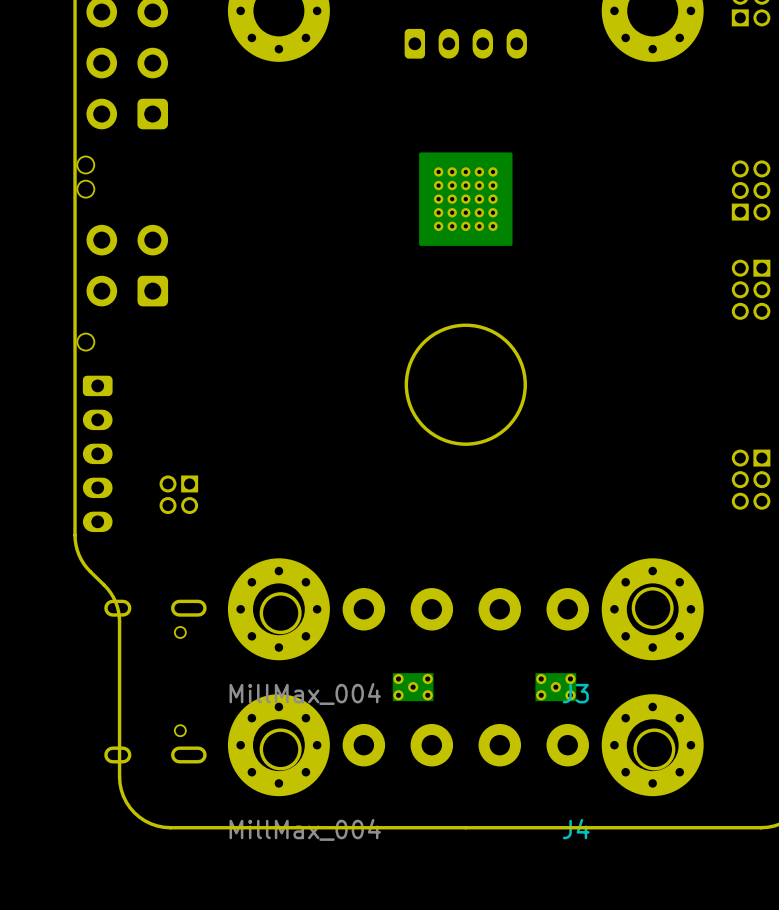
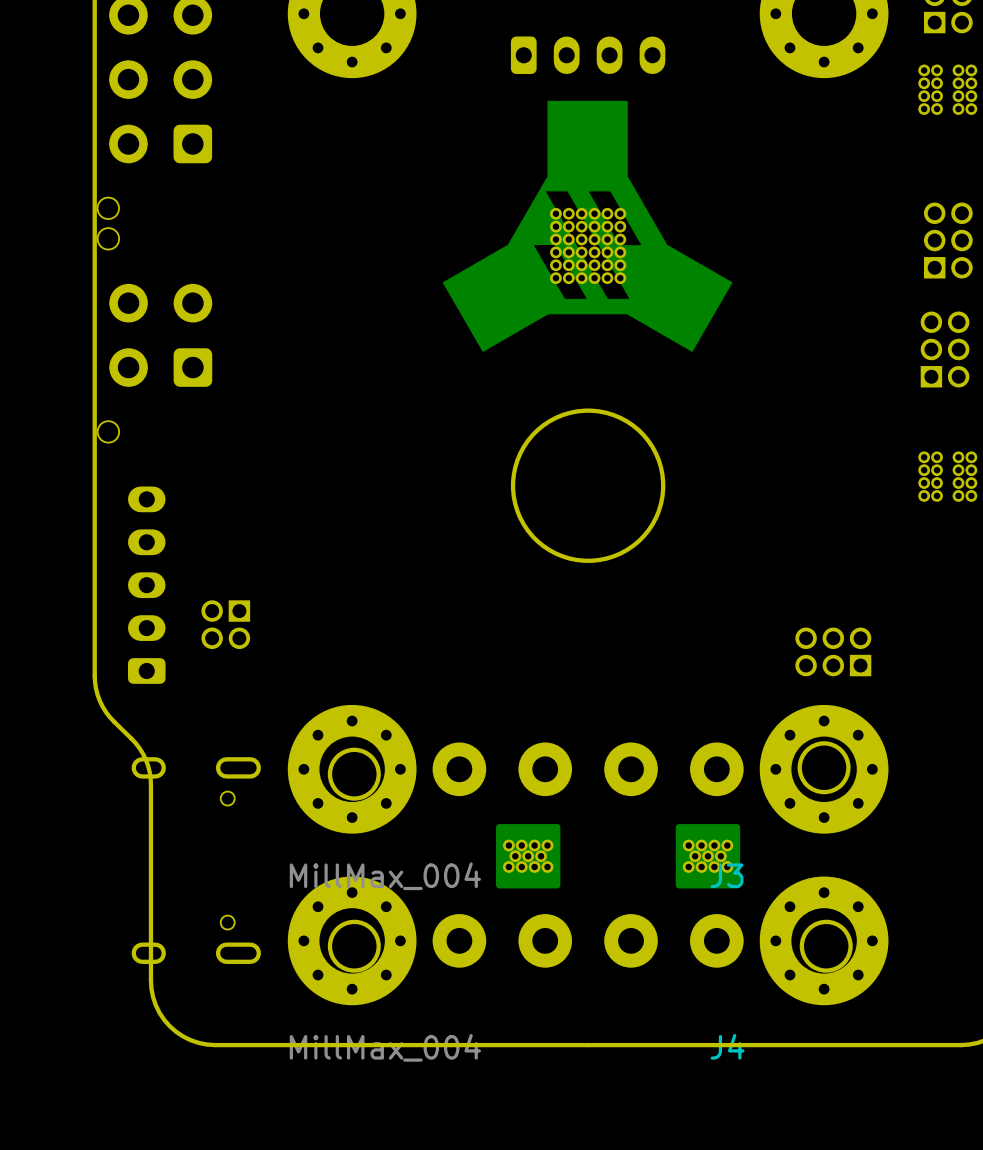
part: none -> (947, 89)
part: none -> (587, 226)
part: (465, 199) -> none
part rotation: 0° (751, 289) -> 180° (945, 349)
part: none -> (947, 476)
part rotation: 0° (97, 453) -> 180° (146, 585)
part rotation: 0° (751, 479) -> 90° clockwise (833, 651)
part position: (751, 479) -> (833, 651)
part footprint: [392, 673, 434, 702] -> [496, 824, 561, 889]
part footprint: [535, 673, 577, 702] -> [675, 824, 741, 889]

